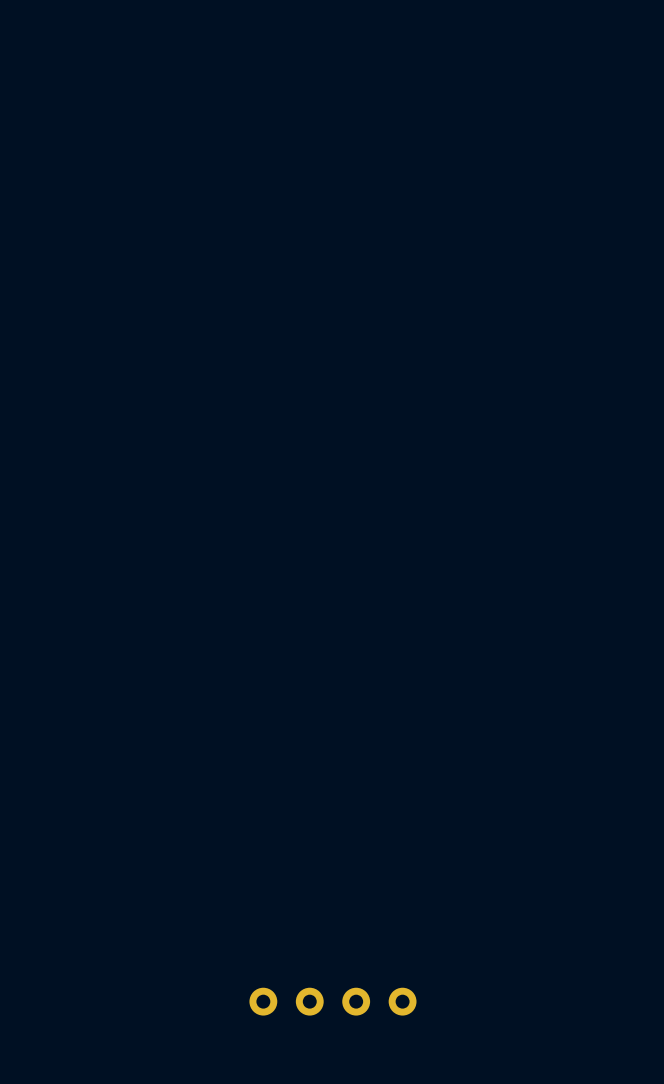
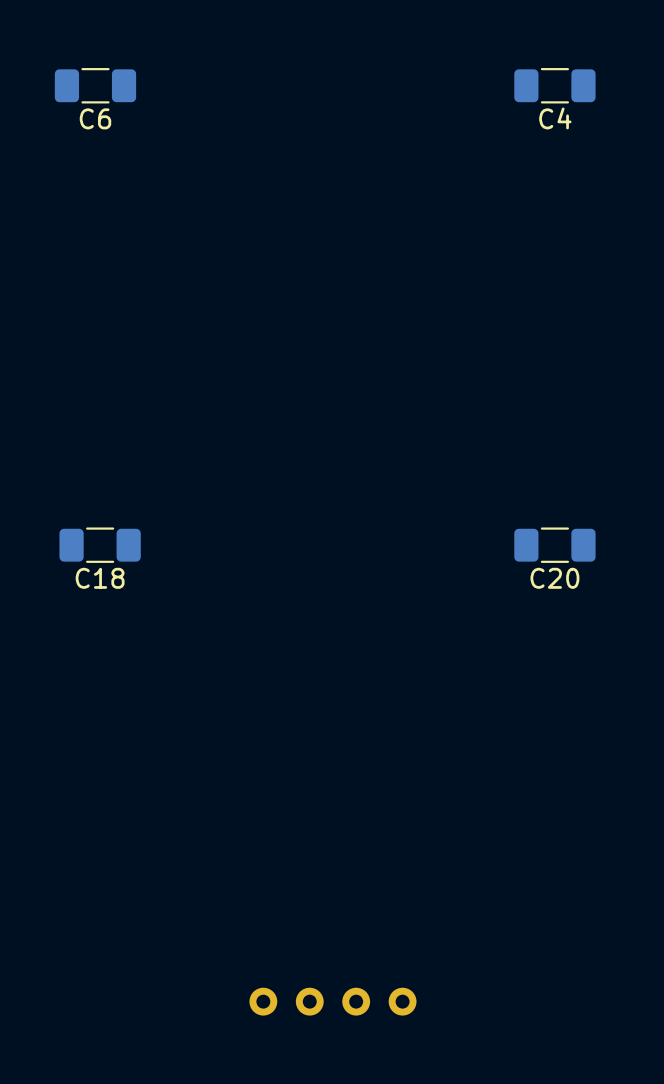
C6: none -> (95, 85)
C4: none -> (554, 85)
C18: none -> (100, 545)
C20: none -> (554, 545)

